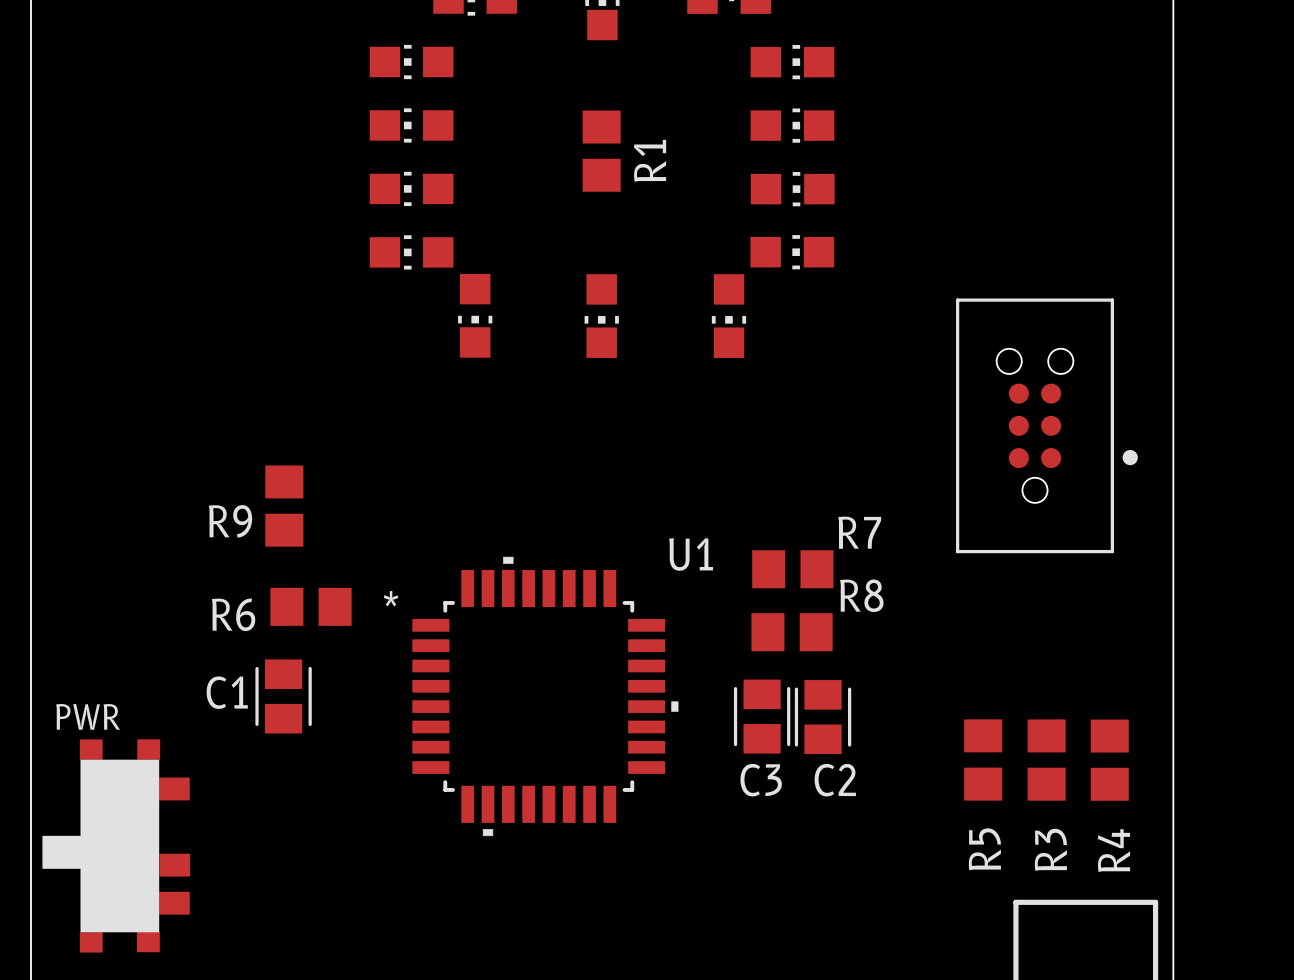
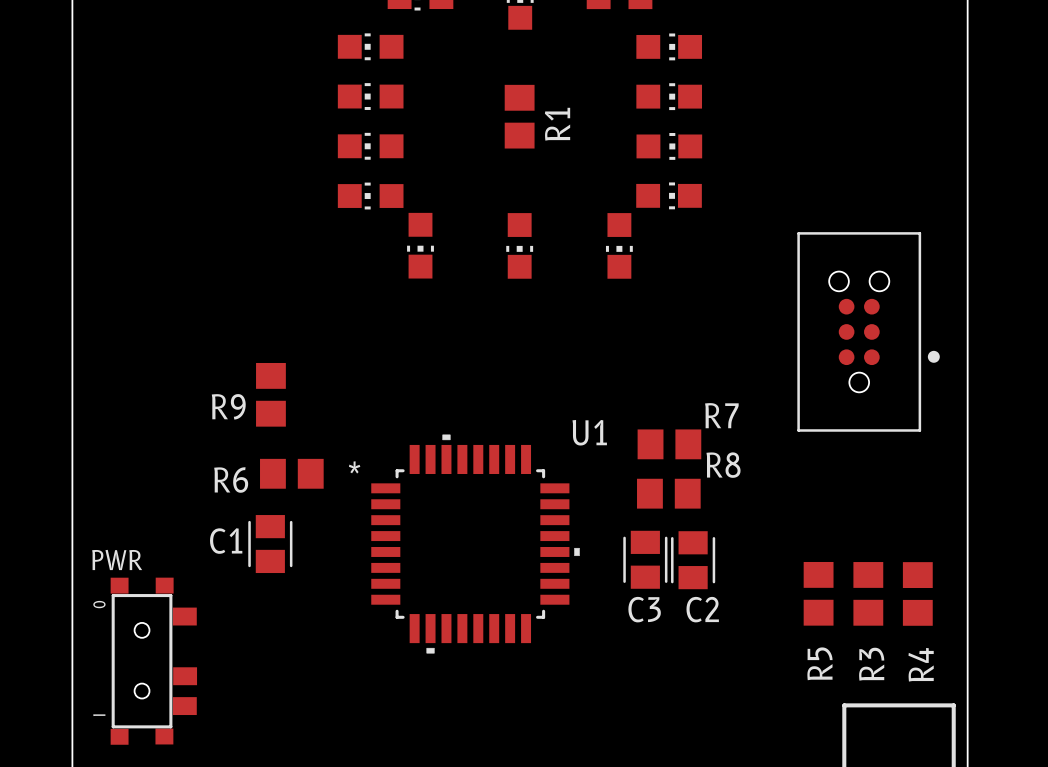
part footprint: [42, 739, 191, 953] -> [110, 577, 198, 745]

